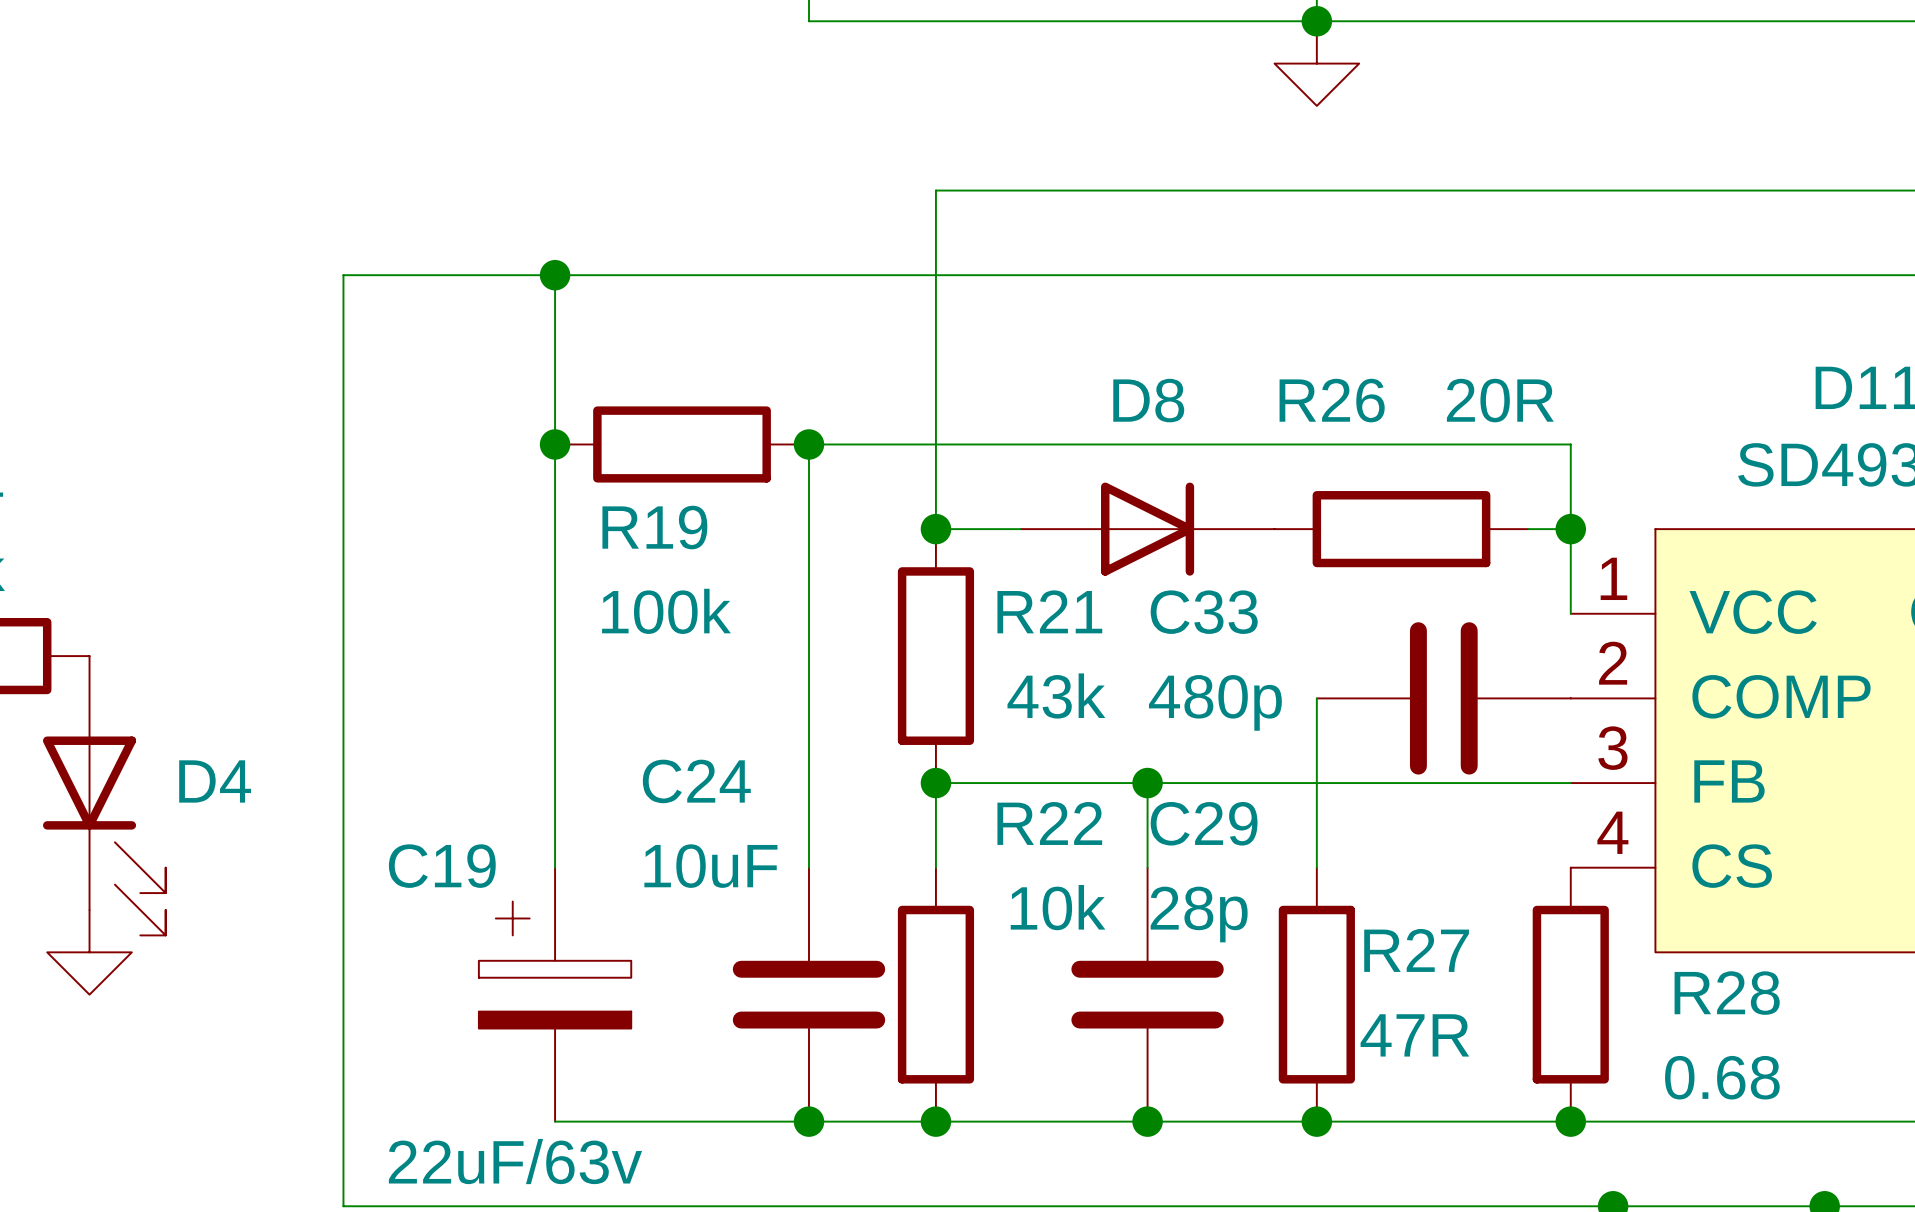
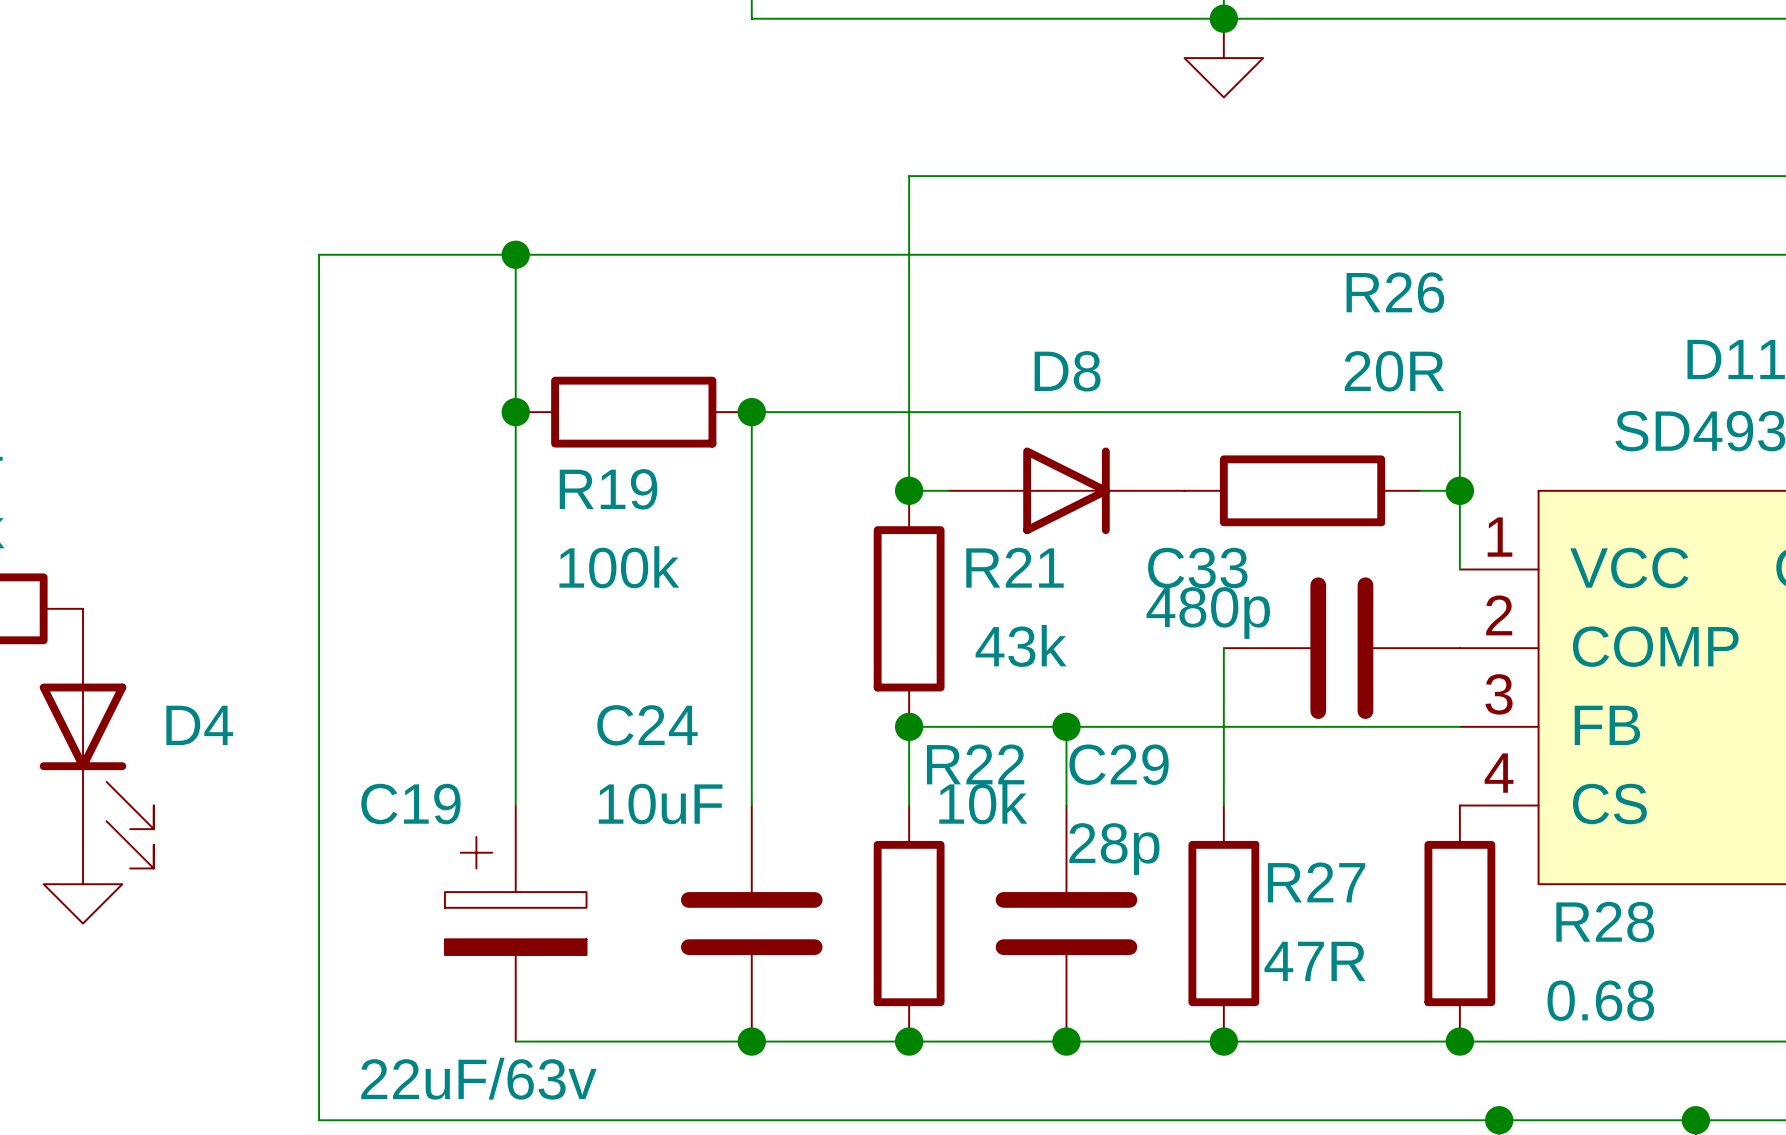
wire: (978, 190) (935, 190) (935, 529) (978, 529) -> (909, 176) (909, 490)
R26 name position: R26 (1332, 400) -> R26 (1395, 292)
junction position: (935, 529) -> (909, 490)
C33 name position: C33 (1204, 612) -> C33 (1197, 568)
R21 position: (935, 656) -> (909, 608)
C33 value position: 480p (1215, 702) -> 480p (1208, 612)
junction position: (935, 783) -> (909, 726)
wire: (978, 783) (935, 783) (935, 867) -> (909, 726) (909, 805)
R22 value position: 10k (1058, 907) -> 10k (983, 803)
R22 position: (935, 994) -> (909, 923)
junction position: (935, 1121) -> (909, 1041)

